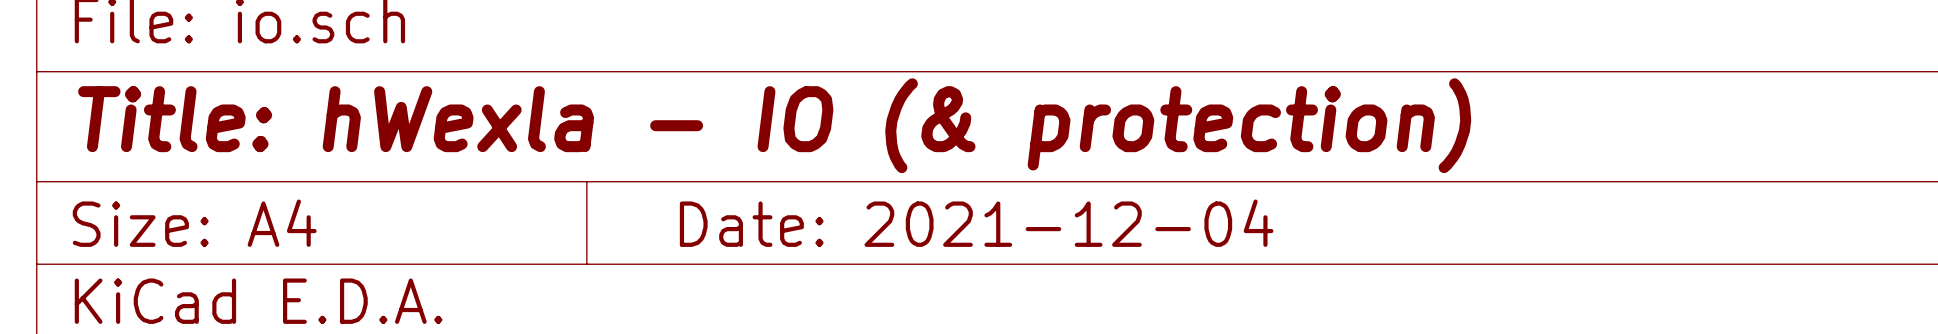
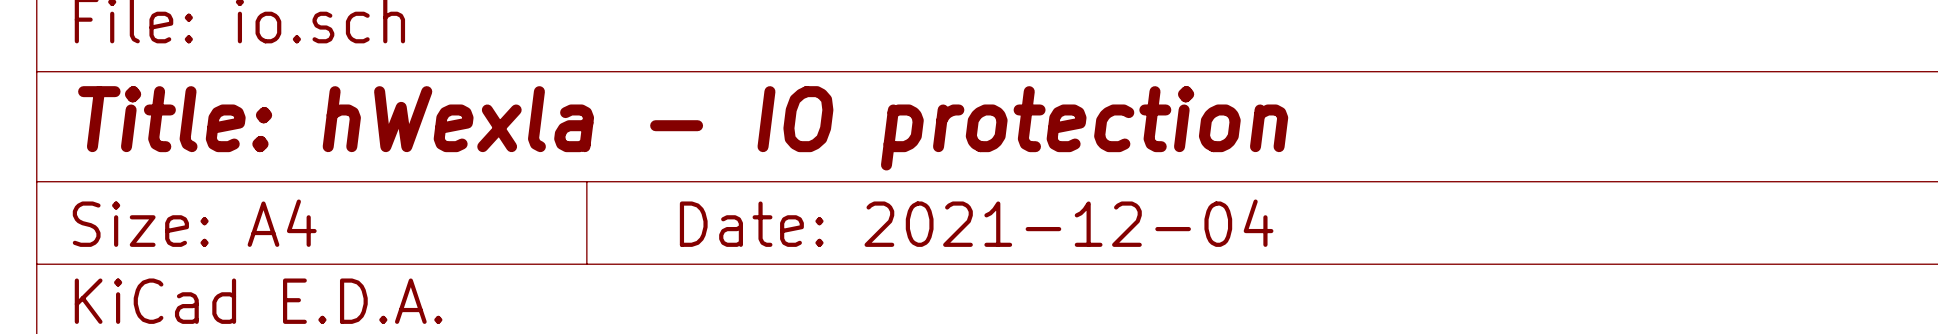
title block: Title: hWexla - IO (& protection) (774, 125) -> Title: hWexla - IO protection (683, 128)

